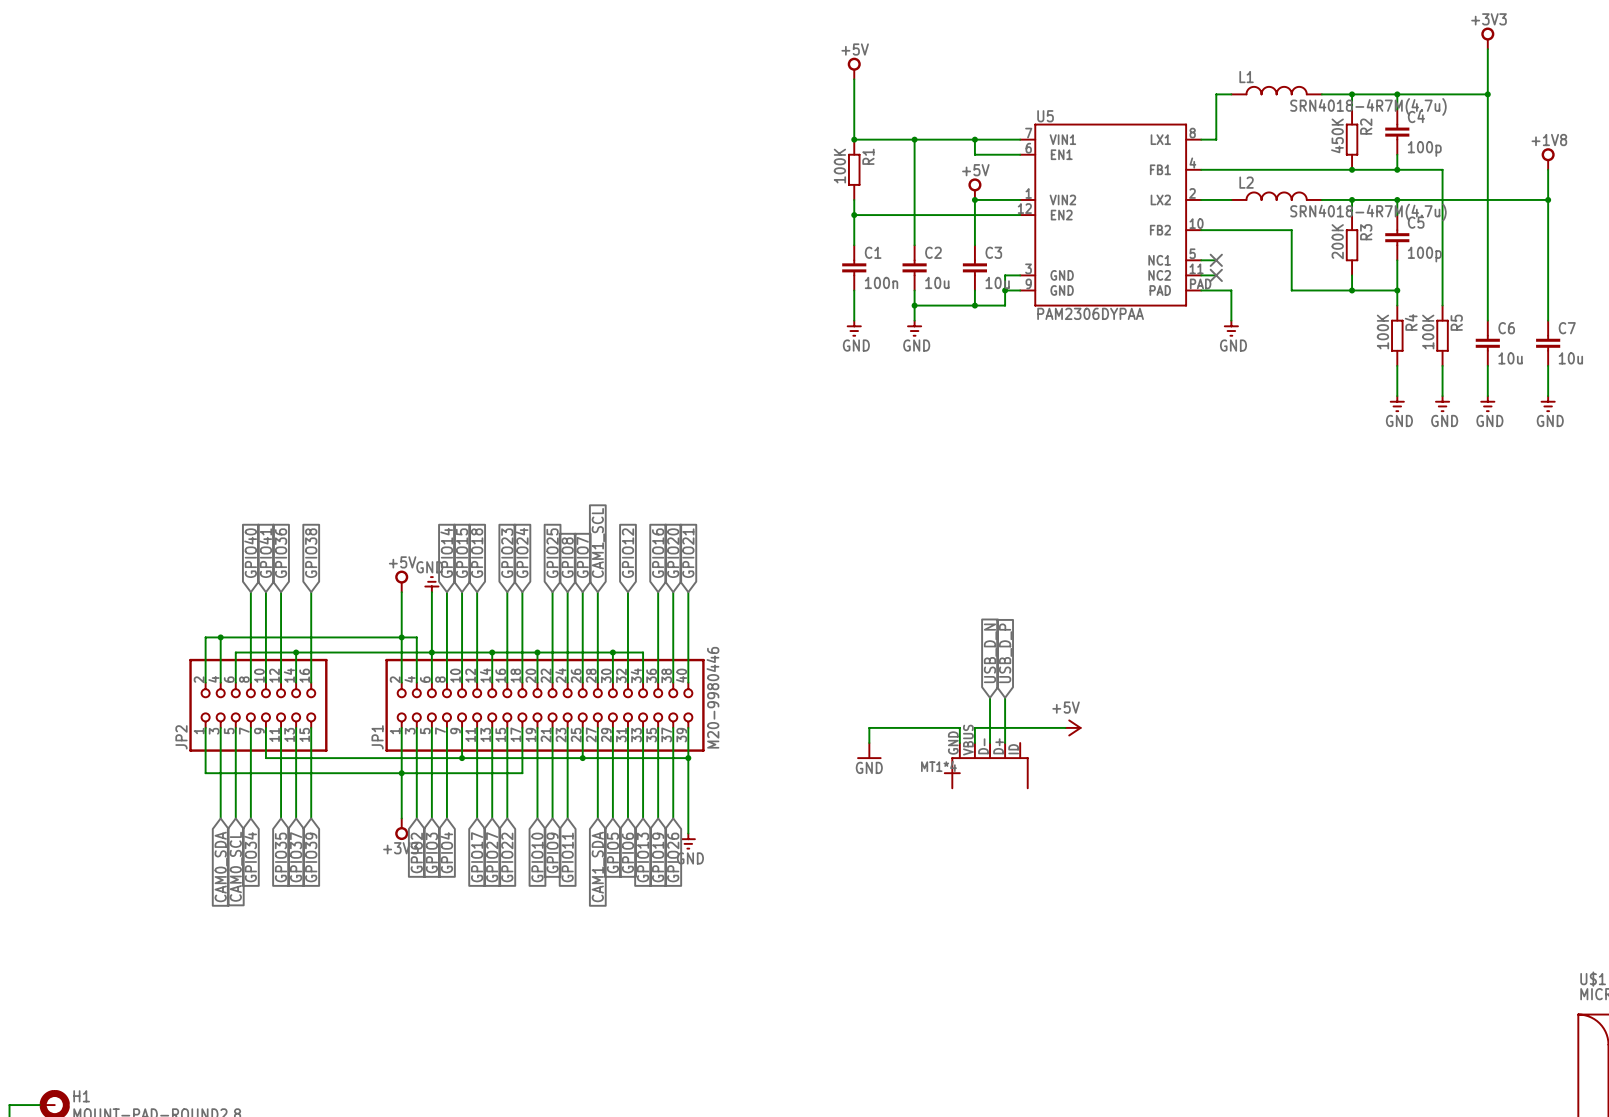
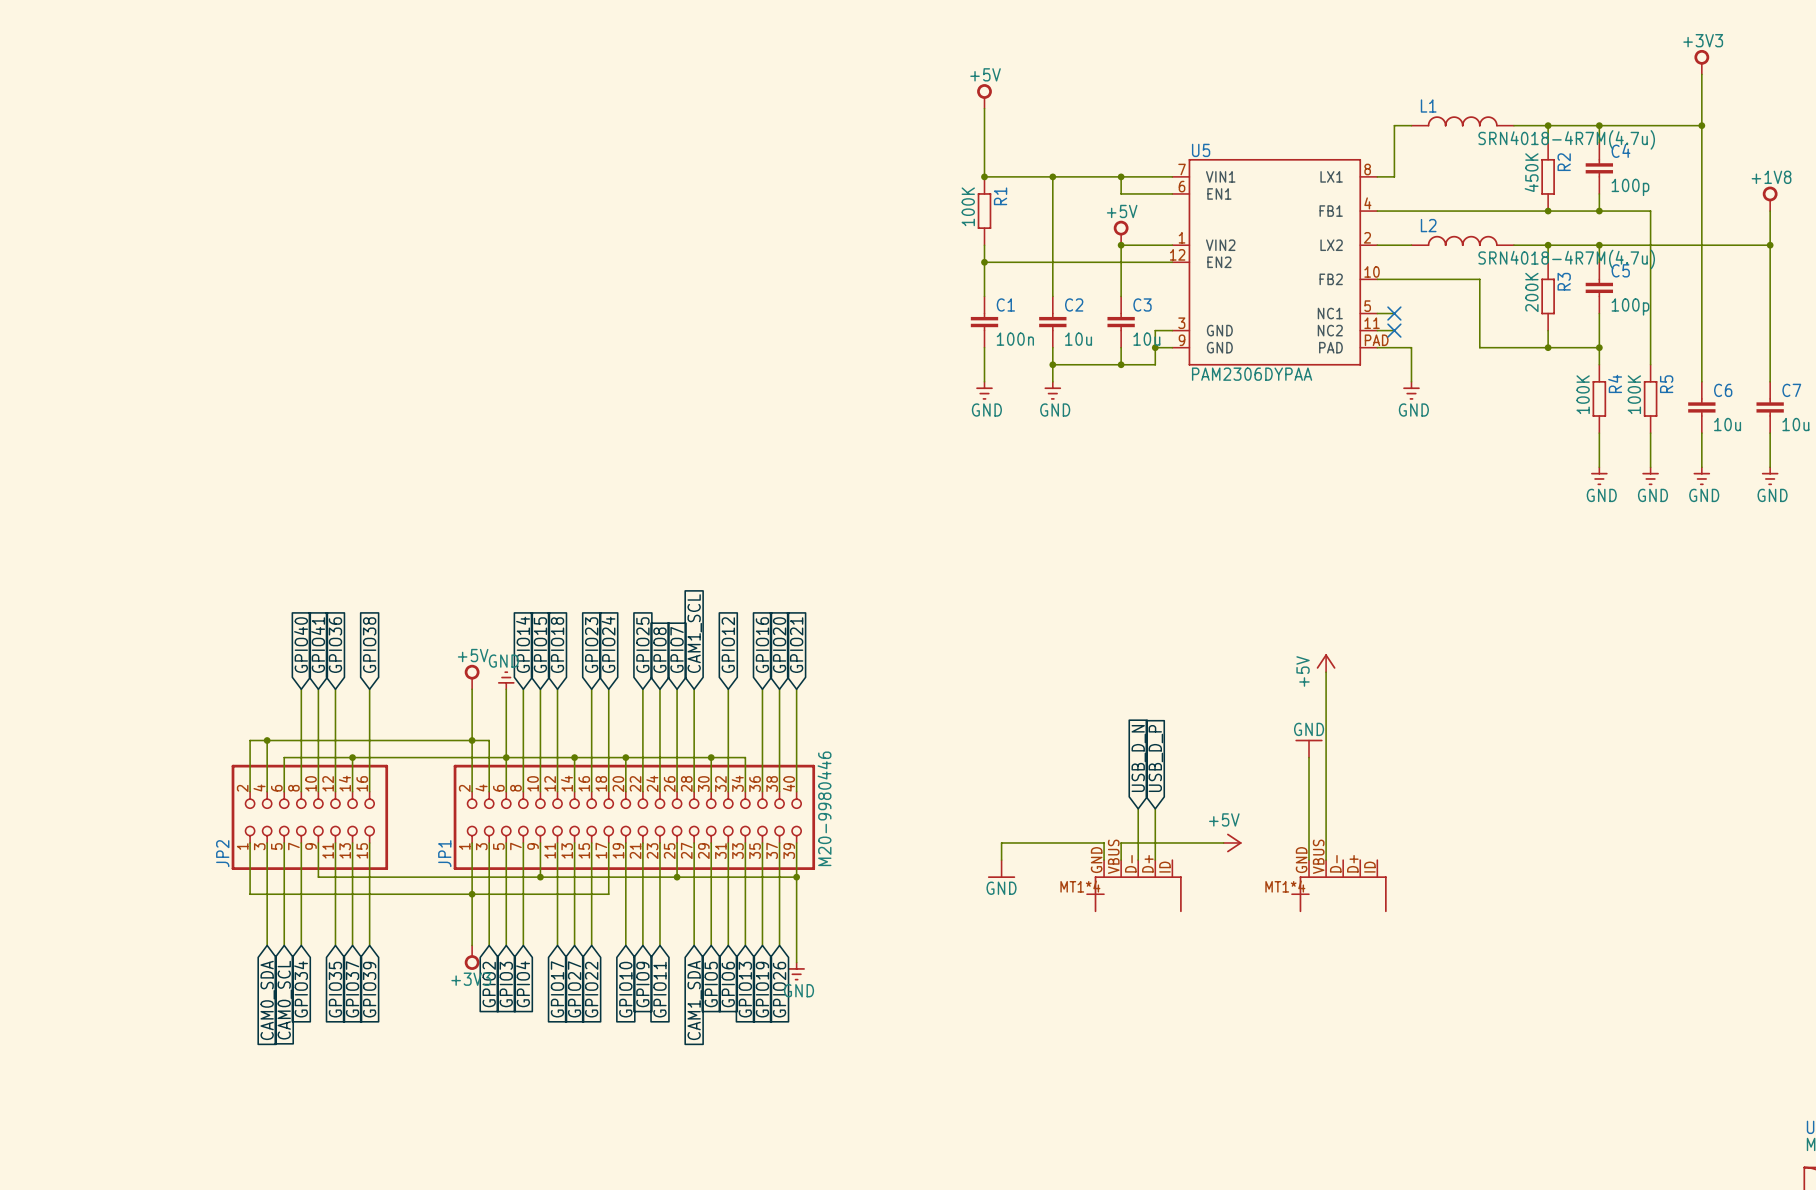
power symbol: none -> +5V (1326, 663)
wire: none -> (1326, 672) (1326, 860)
power symbol: none -> GND (1309, 748)
wire: none -> (1309, 757) (1309, 860)
part: none -> (1339, 886)

